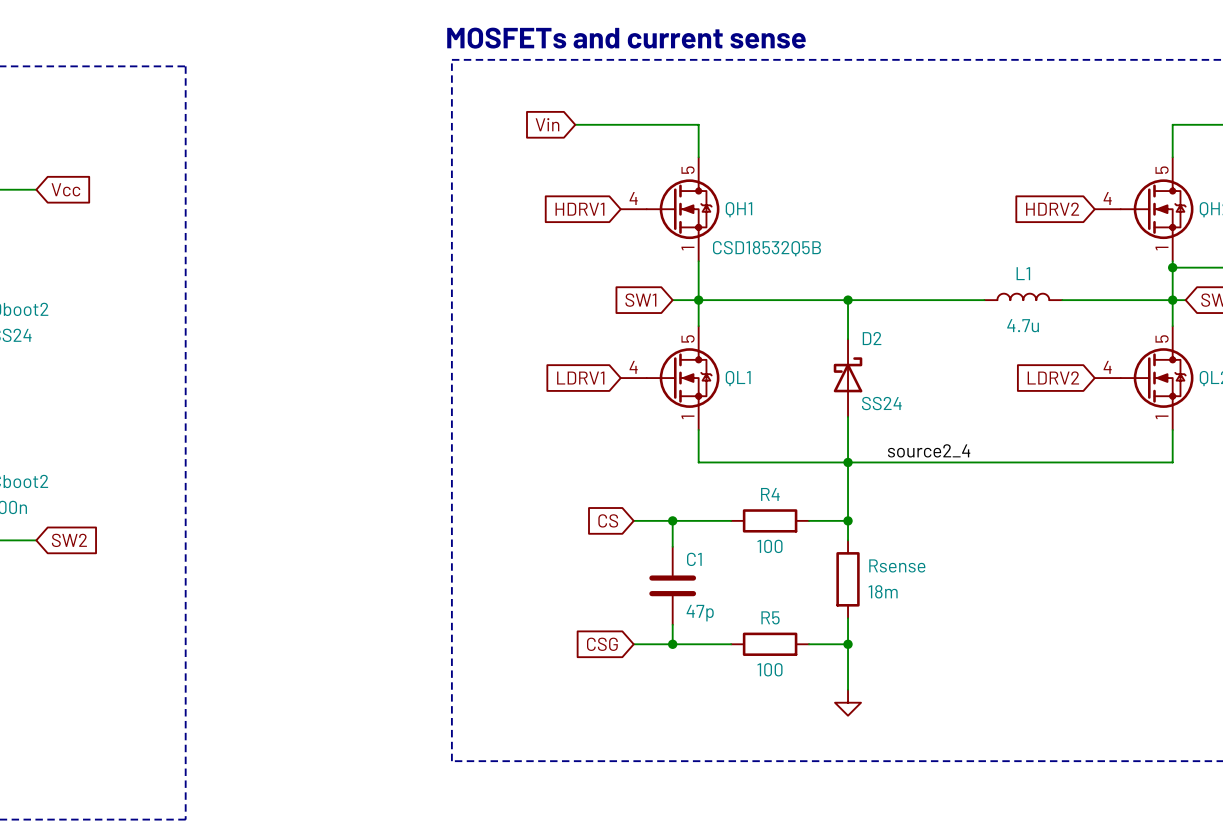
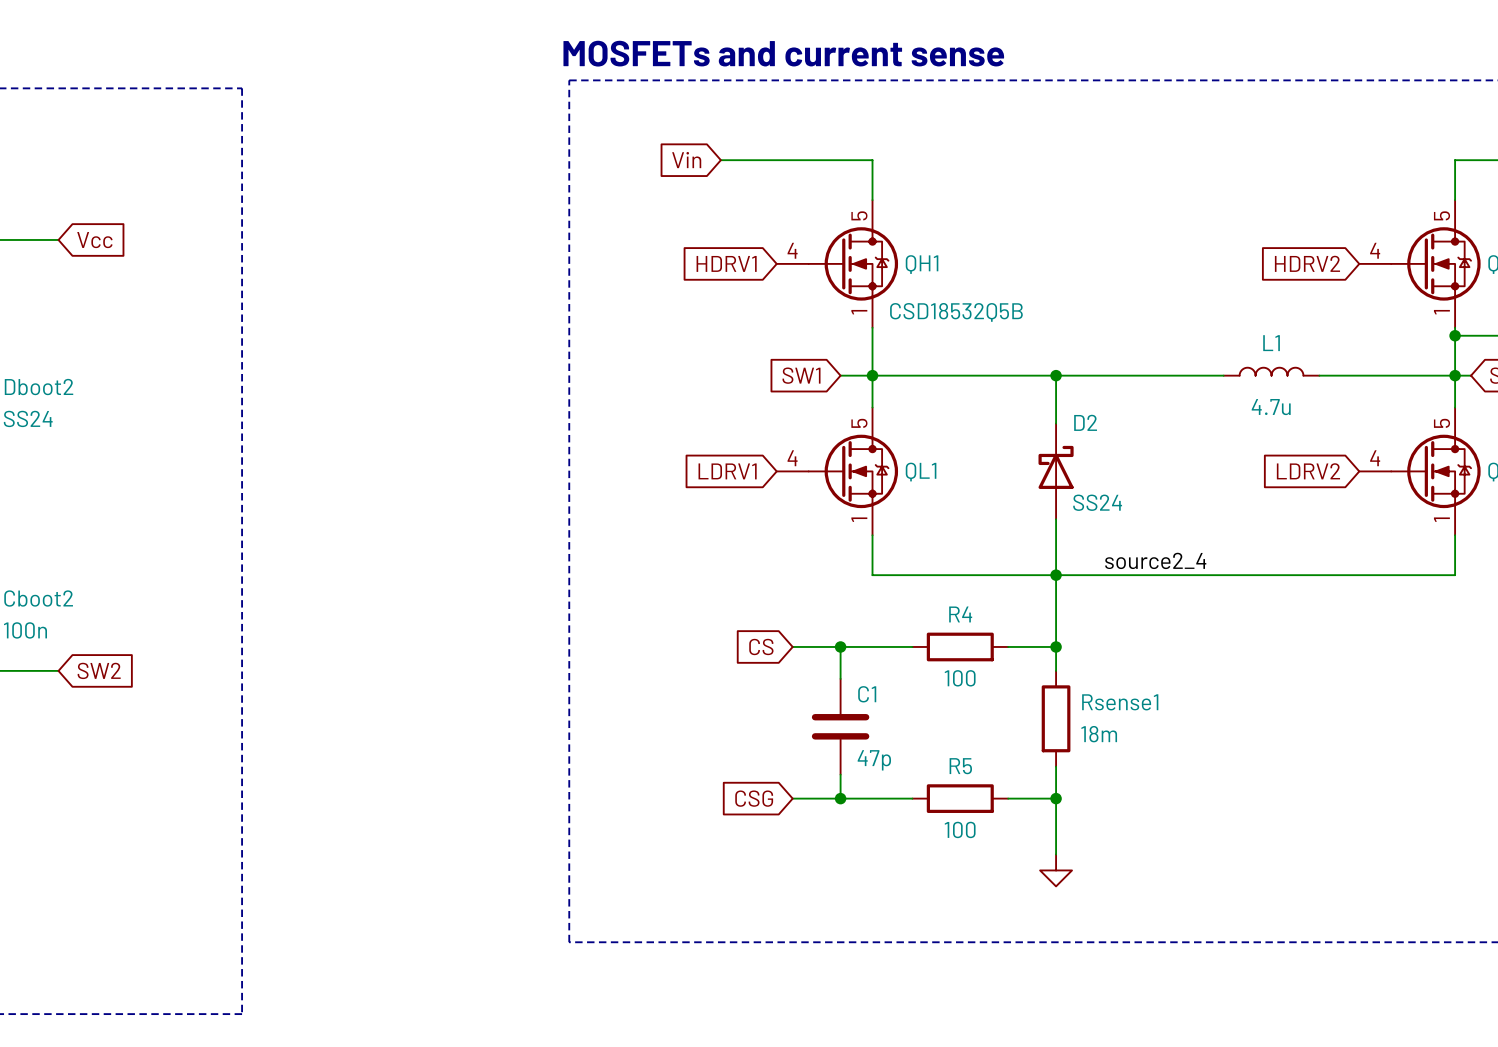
Rsense name: Rsense (897, 565) -> Rsense1 (1120, 702)

